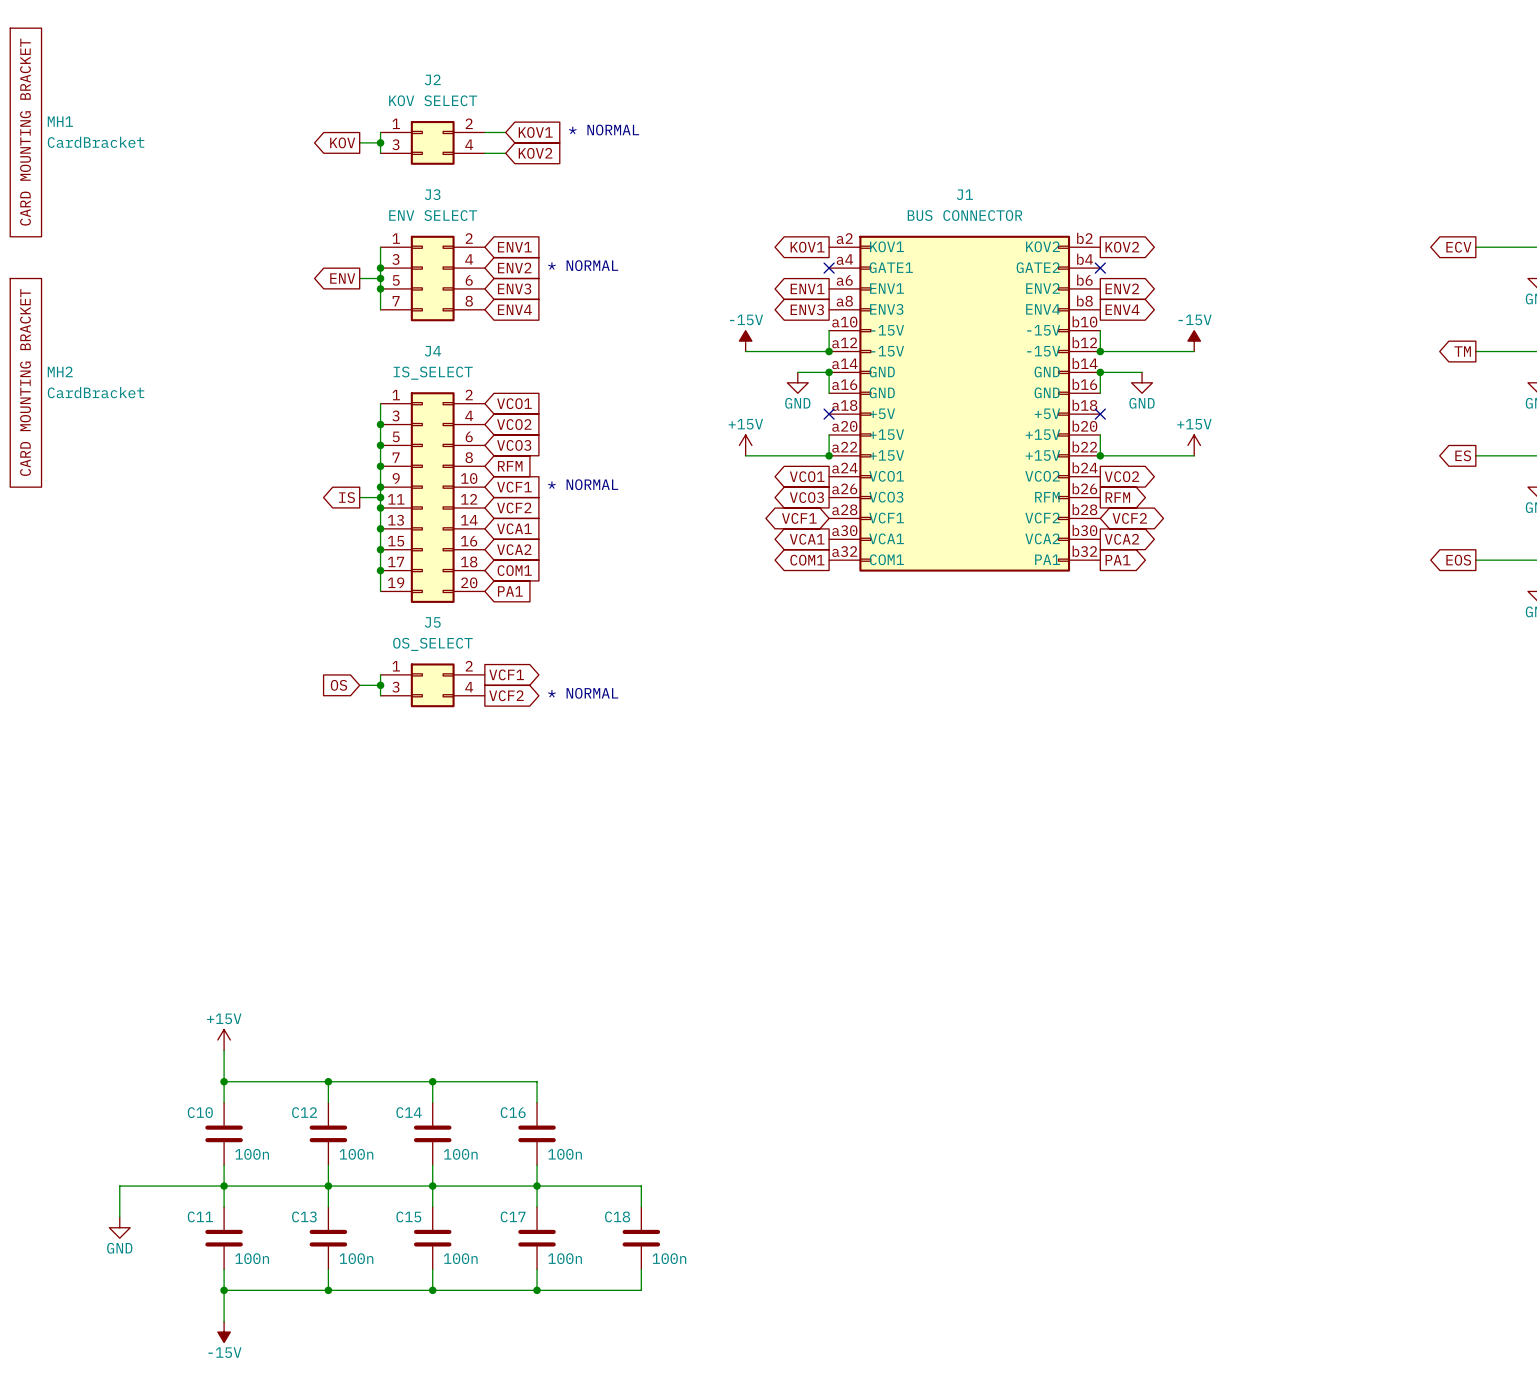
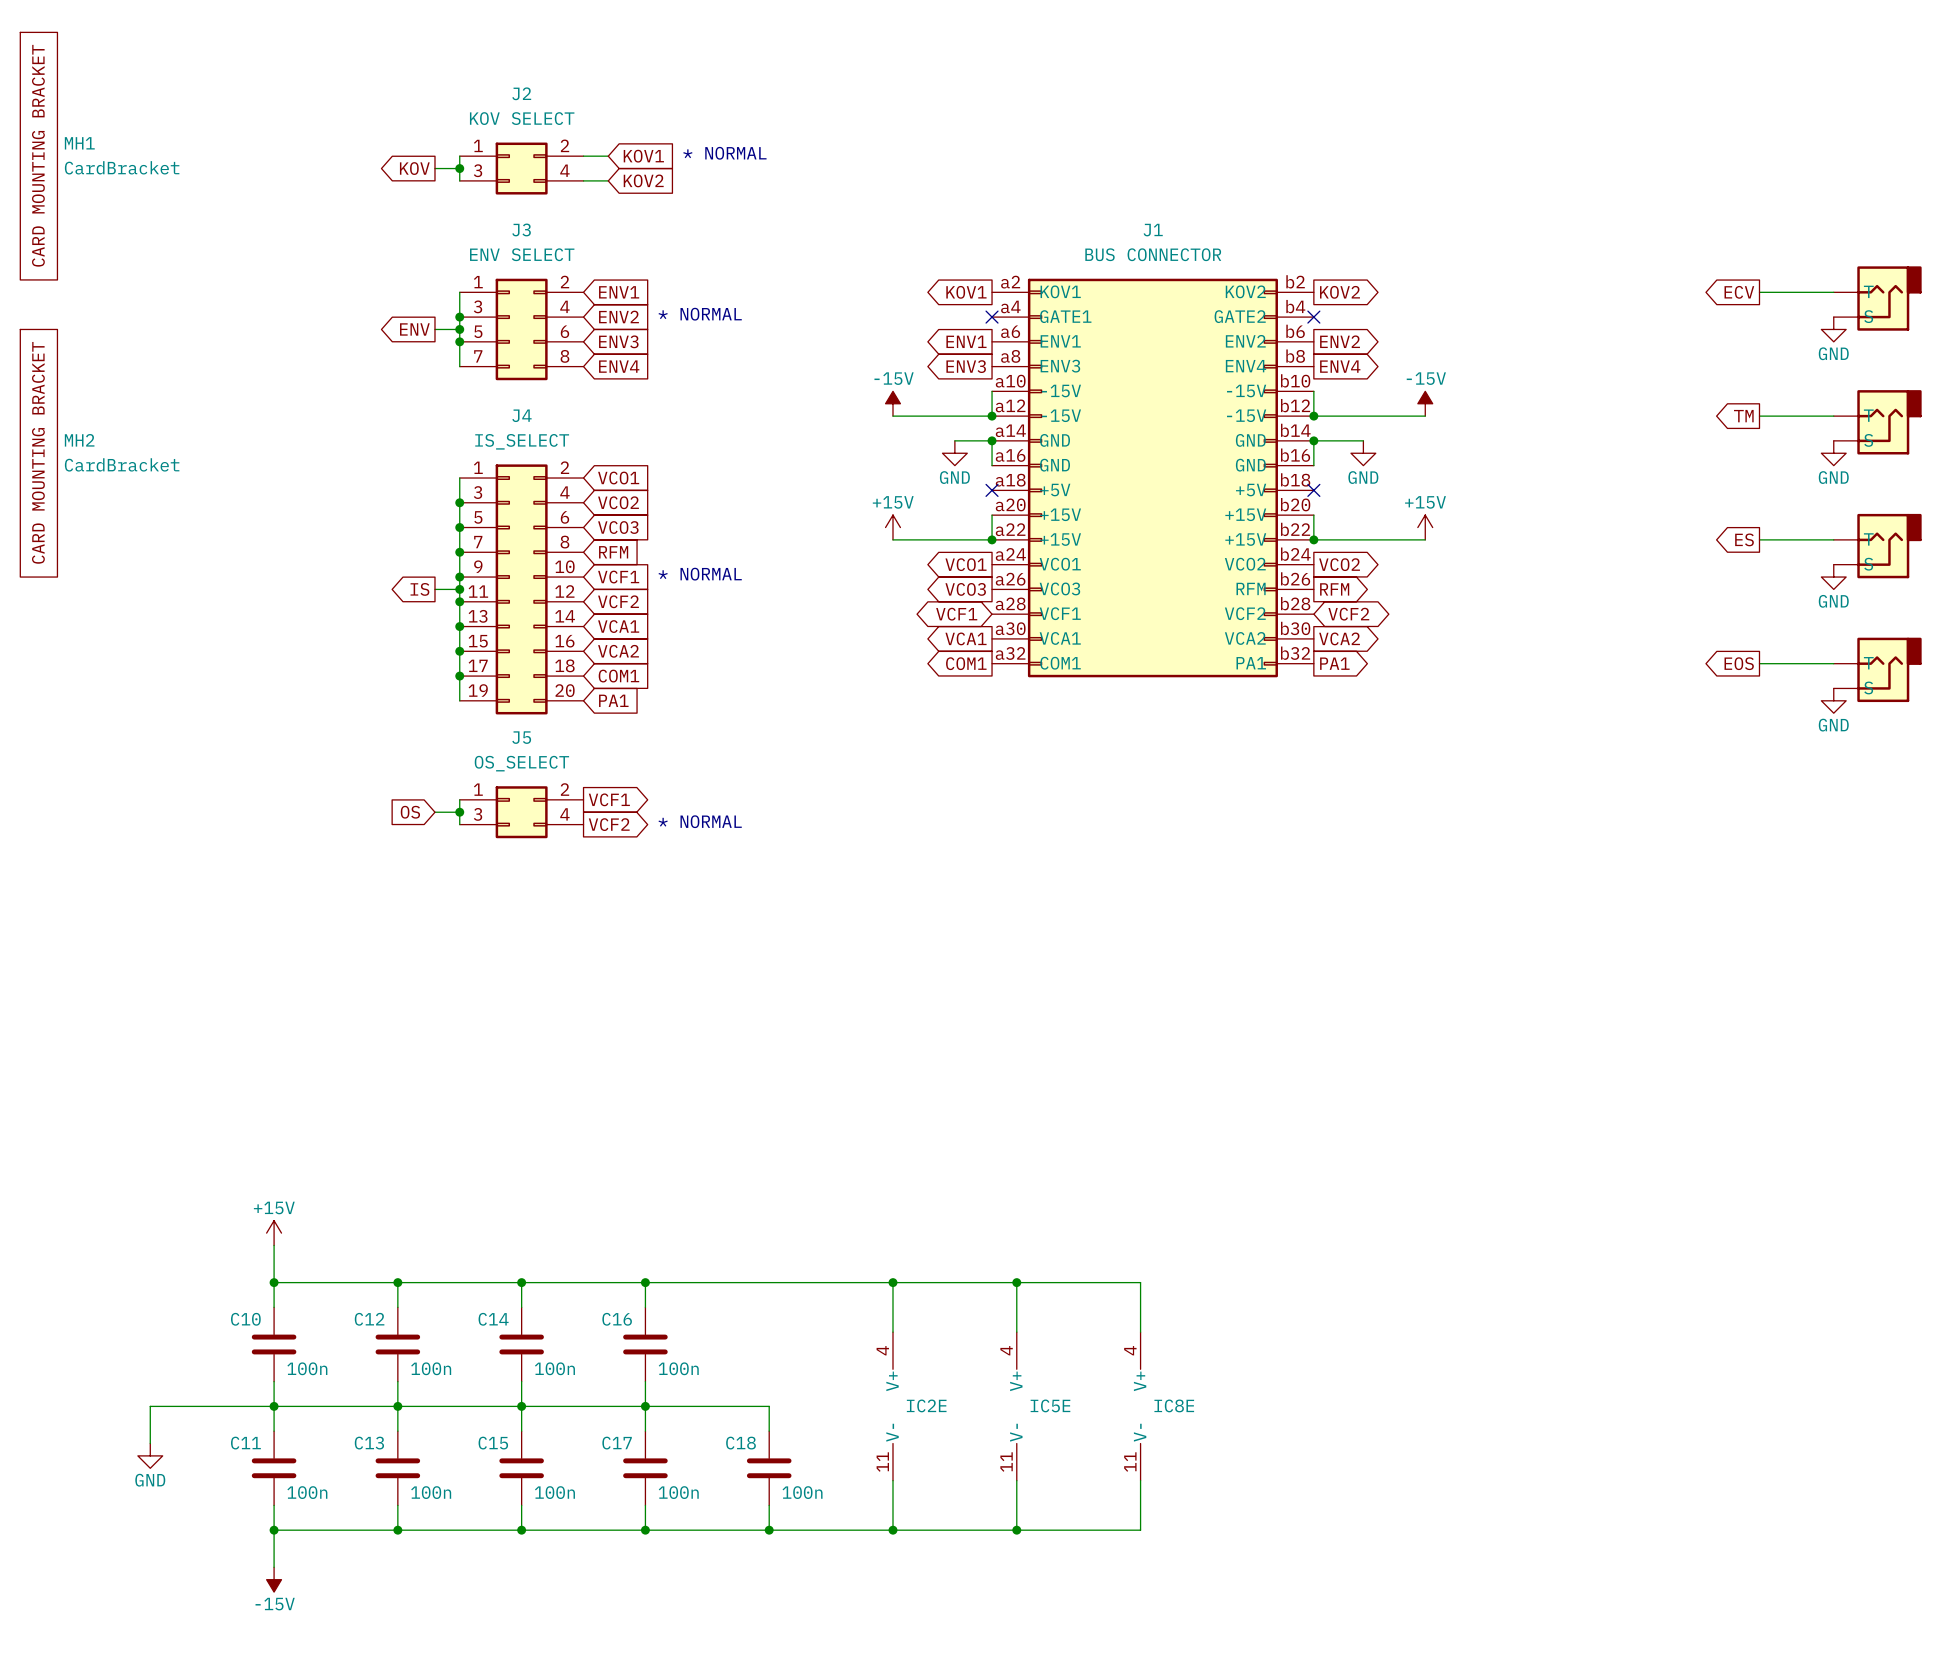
wire: none -> (645, 1282) (1140, 1282) (1140, 1332)
junction: none -> (645, 1282)
wire: none -> (892, 1282) (892, 1332)
junction: none -> (892, 1282)
wire: none -> (1016, 1282) (1016, 1332)
junction: none -> (1016, 1282)
IC2E: none -> (892, 1406)
IC5E: none -> (1016, 1406)
IC8E: none -> (1140, 1406)
wire: none -> (892, 1480) (892, 1530)
wire: none -> (1016, 1480) (1016, 1530)
wire: none -> (1140, 1480) (1140, 1530) (769, 1530)
junction: none -> (769, 1530)
junction: none -> (892, 1530)
junction: none -> (1016, 1530)

